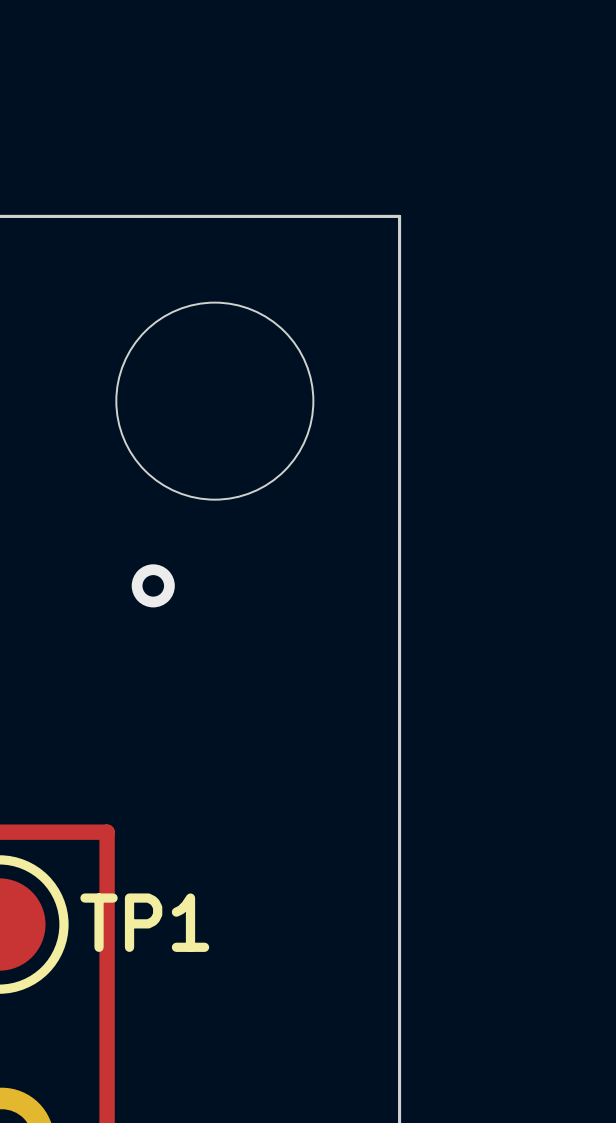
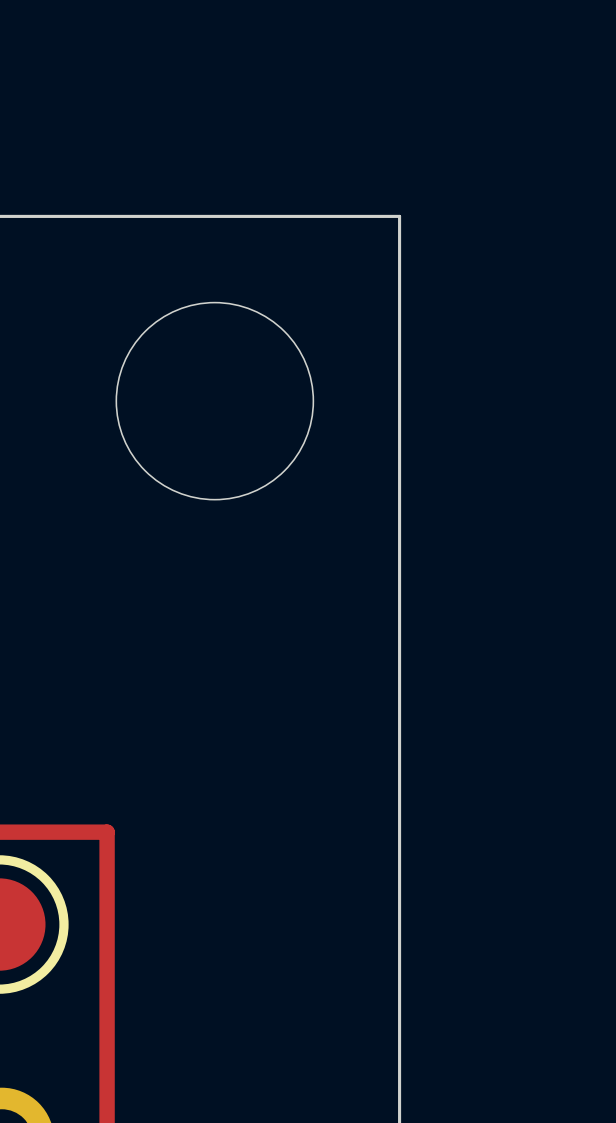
via: (153, 585) -> none
TP1 name: TP1 (144, 922) -> none

